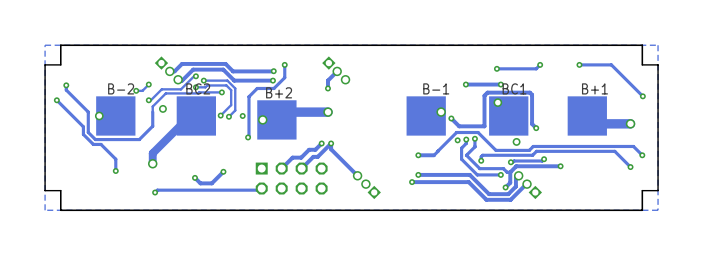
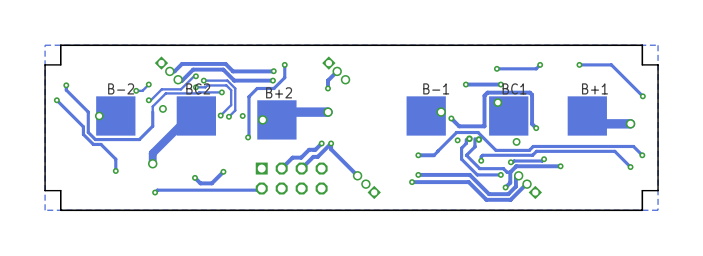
via: none -> (469, 138)
via: (474, 138) -> none
via: (466, 139) -> none
via: none -> (478, 139)

